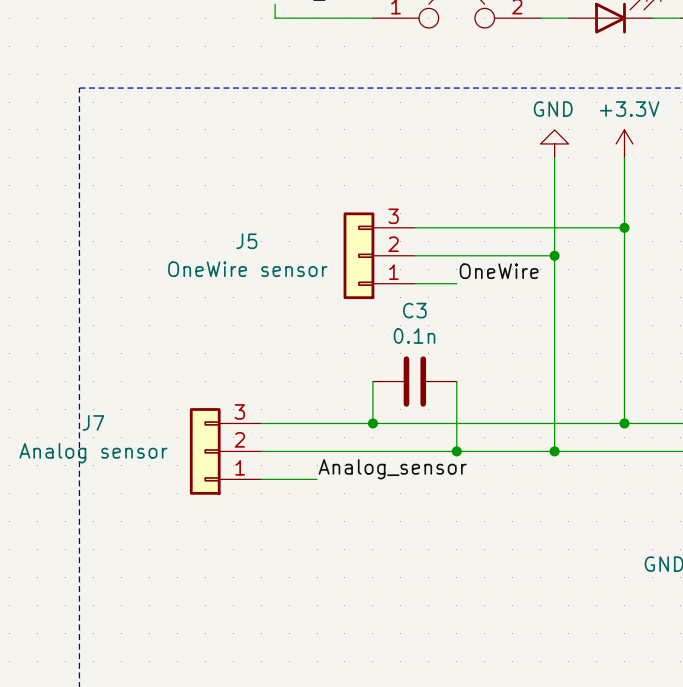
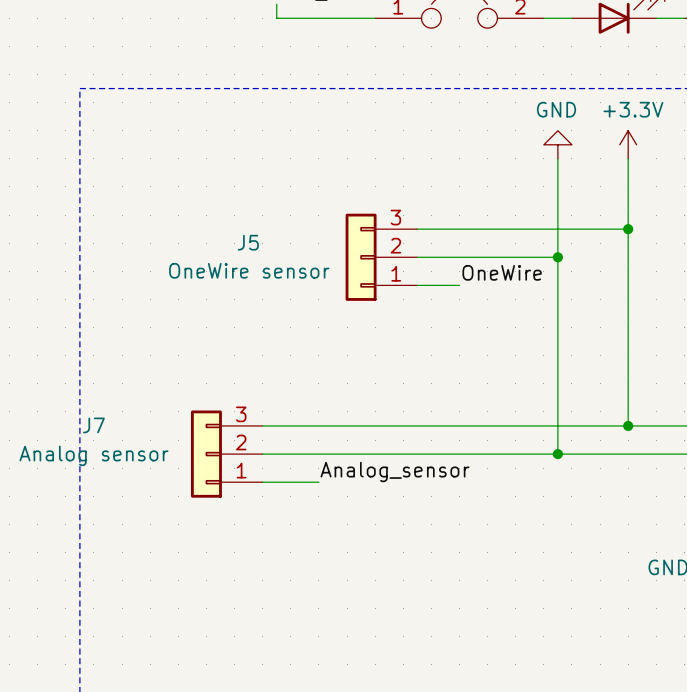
wire: (372, 381) (372, 423) -> none
C3: 0.1n (414, 381) -> none
wire: (456, 381) (456, 451) -> none
junction: (372, 423) -> none
junction: (456, 451) -> none

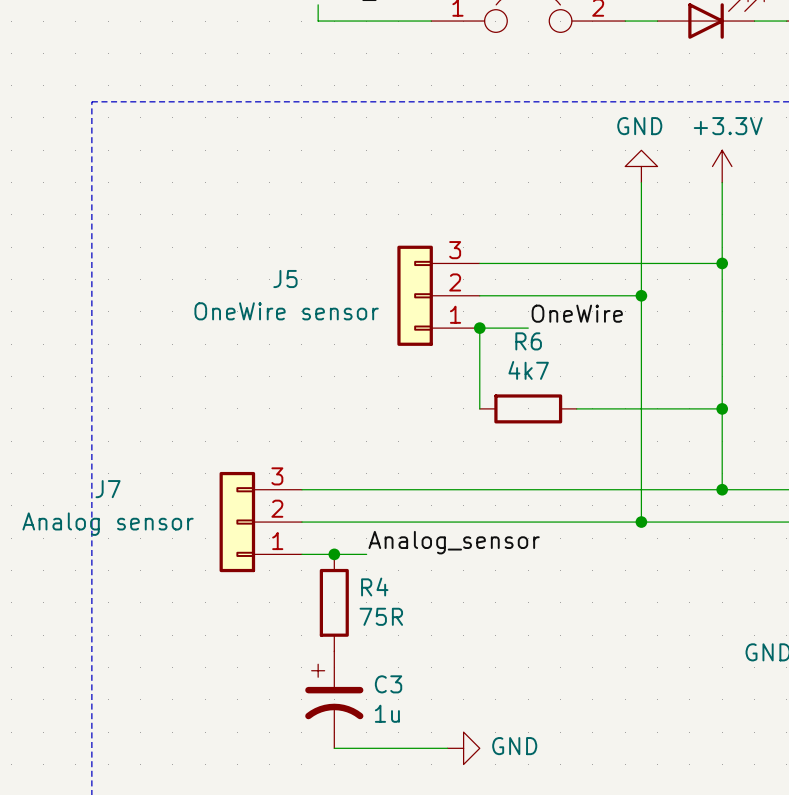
wire: none -> (479, 328) (479, 408)
junction: none -> (479, 328)
R6: none -> 4k7 (528, 408)
wire: none -> (576, 408) (722, 408)
junction: none -> (722, 408)
junction: none -> (334, 554)
R4: none -> 75R (334, 602)
C3: none -> 1u (334, 699)
wire: none -> (334, 748) (447, 748)
power symbol: none -> GND (463, 748)

